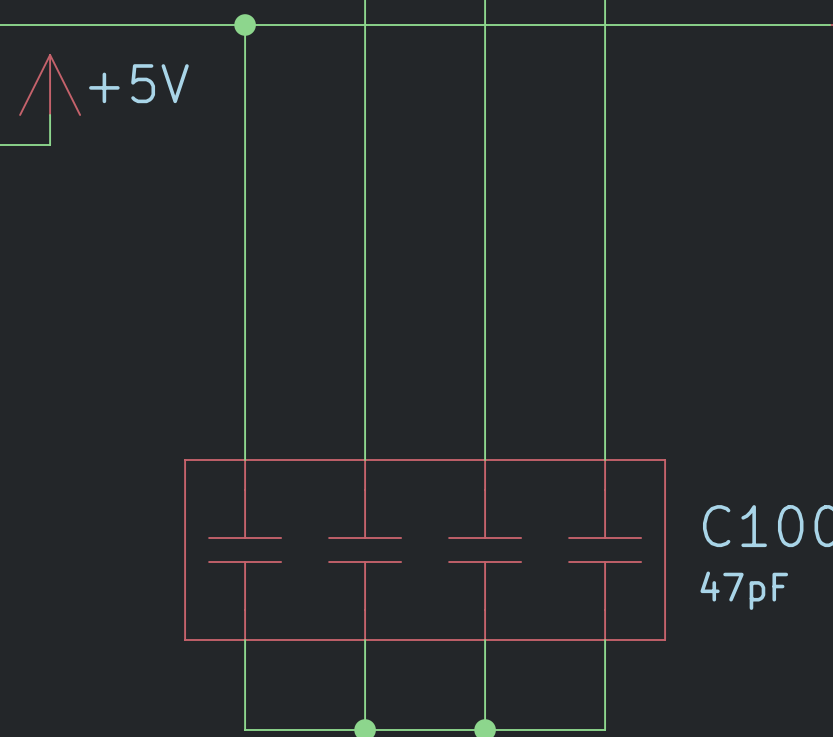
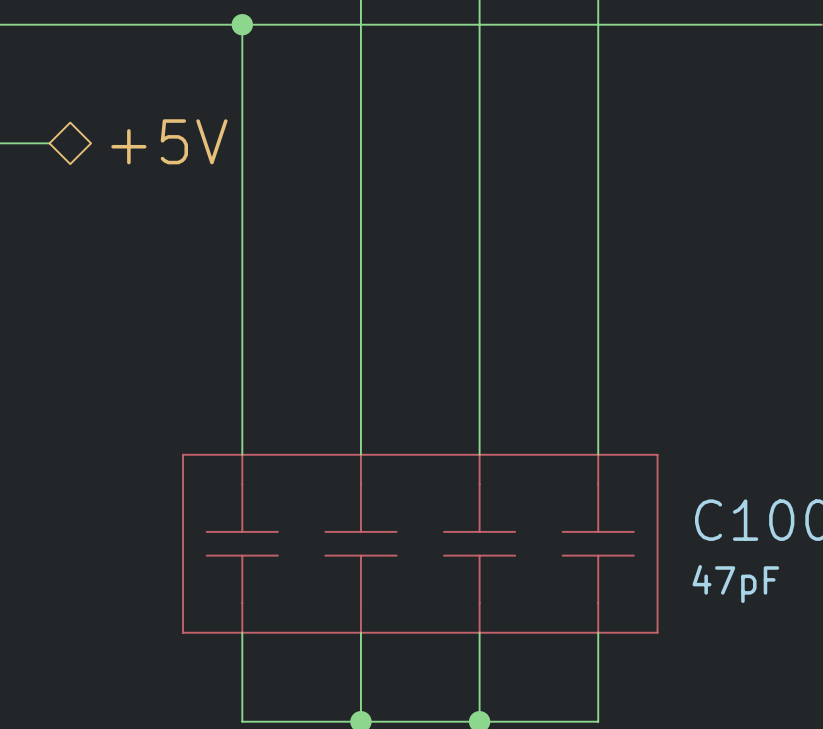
power symbol: +5V (50, 85) -> none
wire: (50, 115) (50, 145) -> none
hierarchical label: none -> +5V (169, 141)

